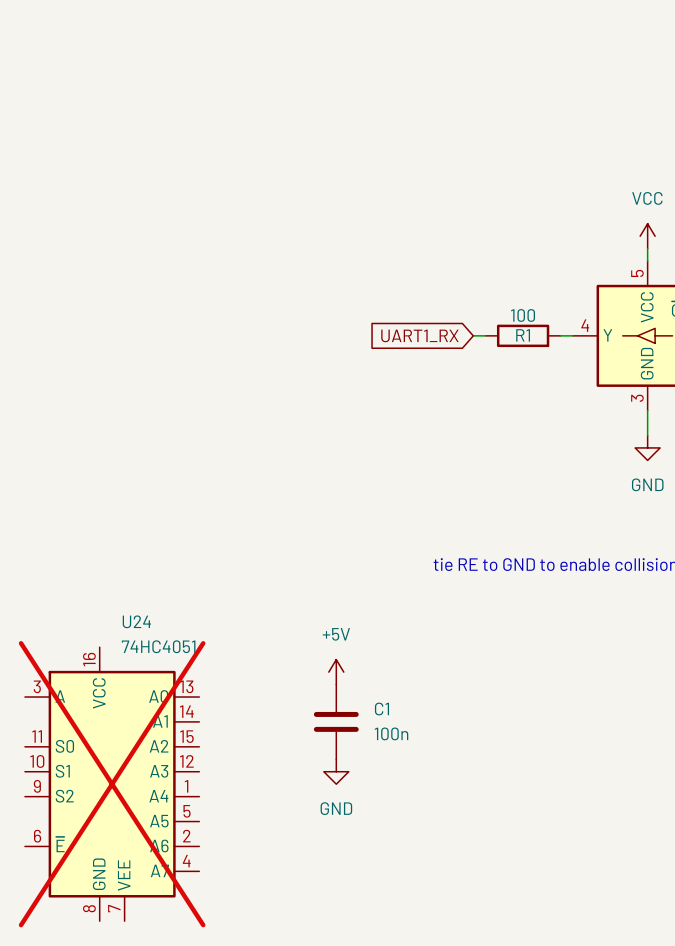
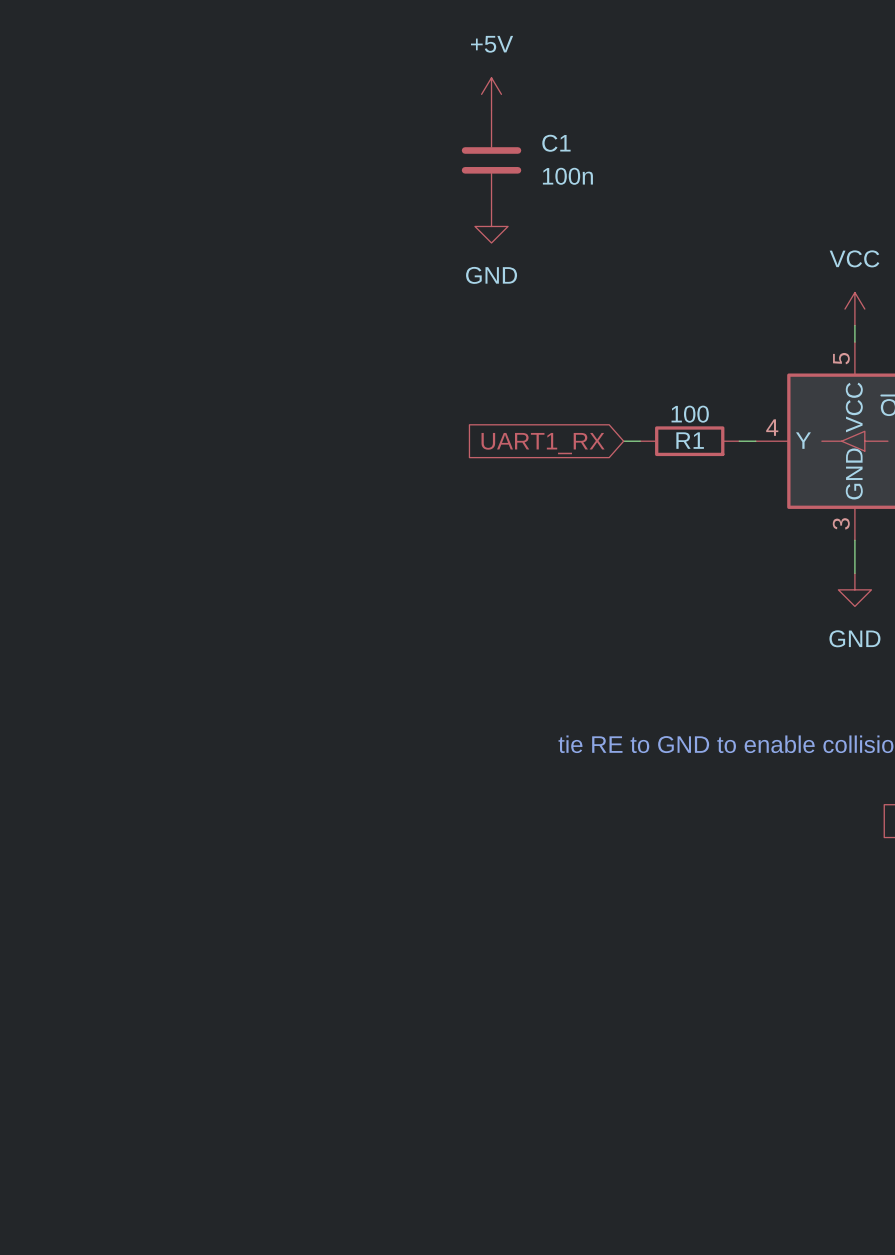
power symbol: none -> +5V (491, 94)
power symbol: none -> GND (491, 226)
power symbol: +5V (336, 672) -> none
C1 position: (336, 721) -> (491, 160)
power symbol: GND (336, 771) -> none
U24: 74HC4051 (112, 784) -> none

